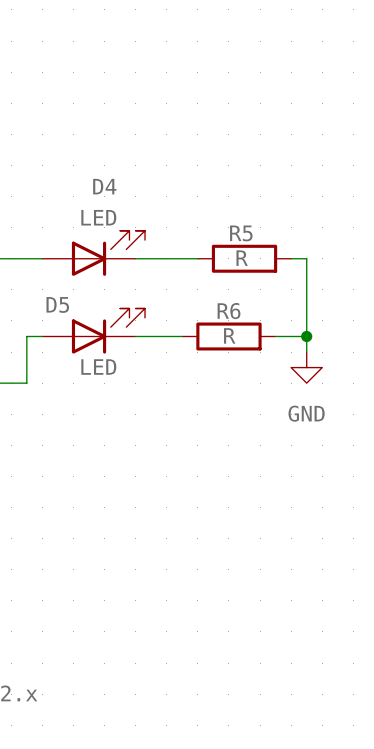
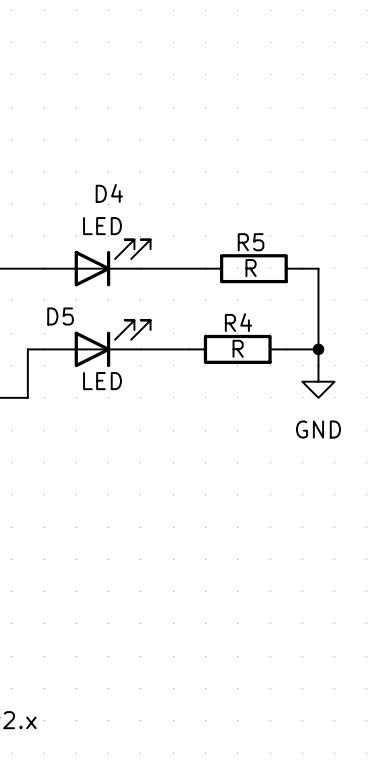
R6 name: R6 (229, 311) -> R4 (238, 322)

